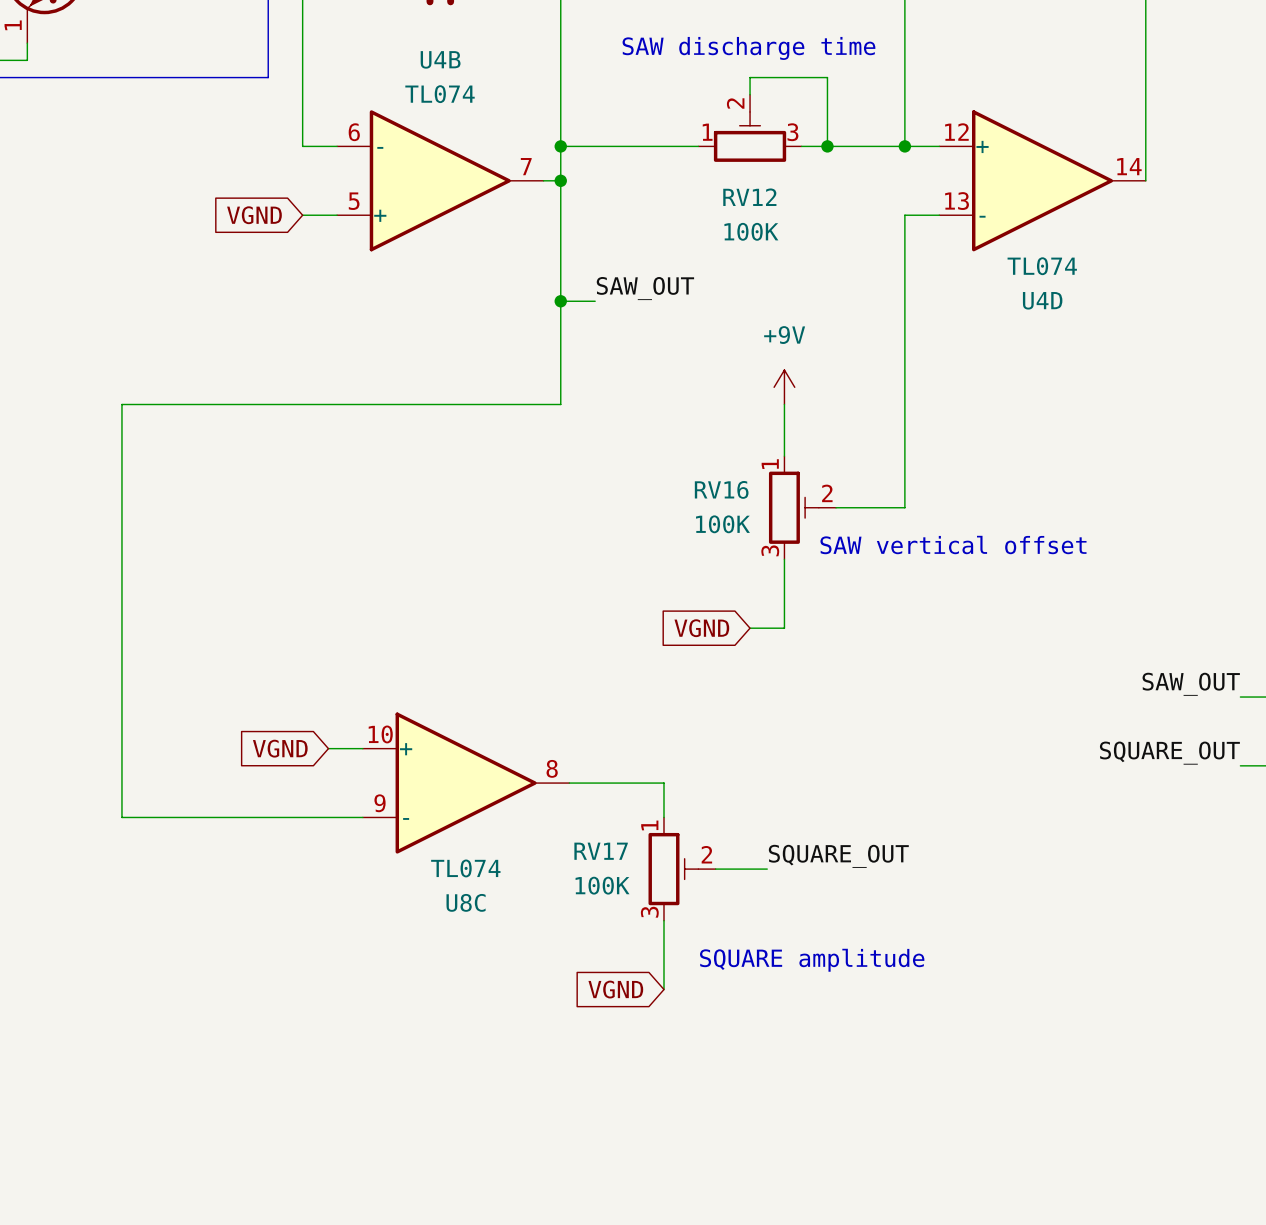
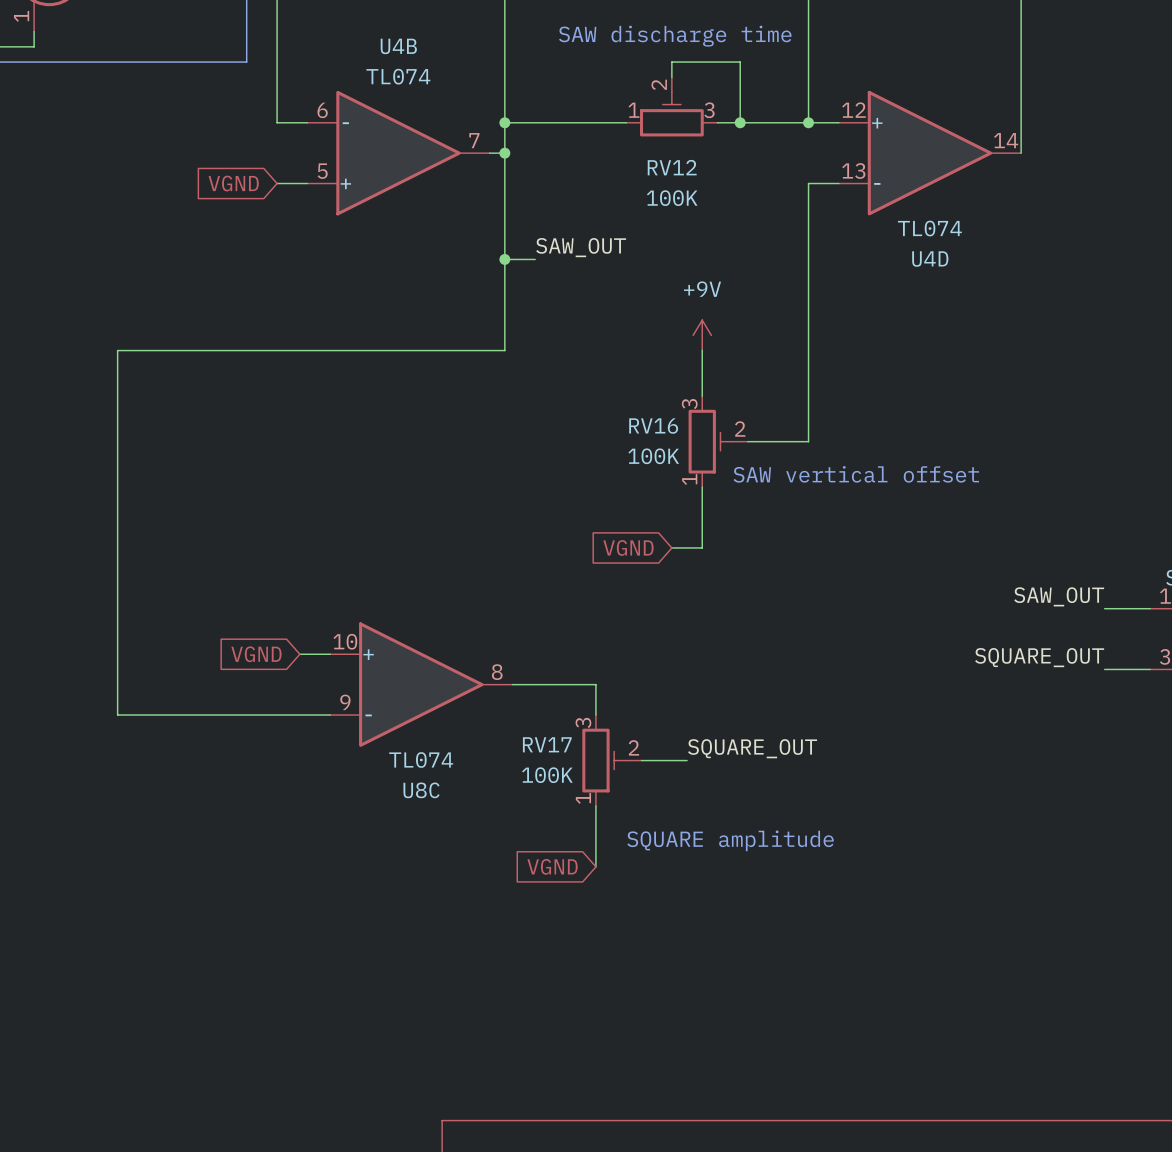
RV16 flip: as is (793, 507) -> up-down (710, 441)
RV17 flip: as is (673, 869) -> up-down (604, 760)

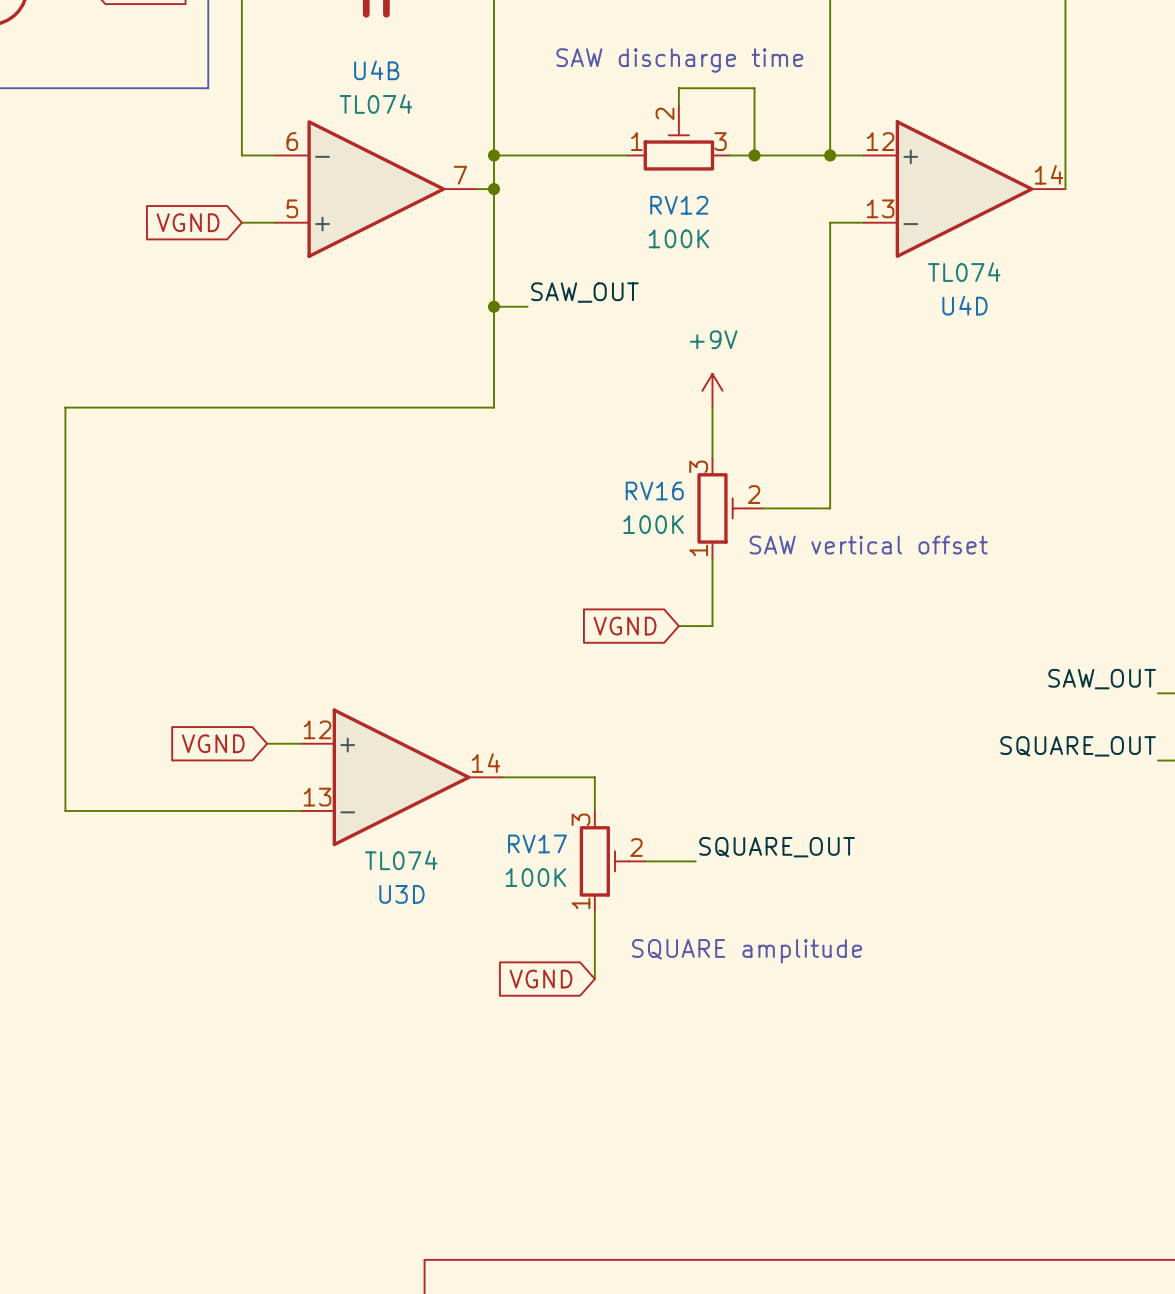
U8C pin number: 10 (345, 641) -> 12 (317, 729)
U8C pin number: 8 (497, 672) -> 14 (485, 763)
U8C pin number: 9 (345, 702) -> 13 (317, 797)
U8C name: U8C (421, 790) -> U3D (401, 894)

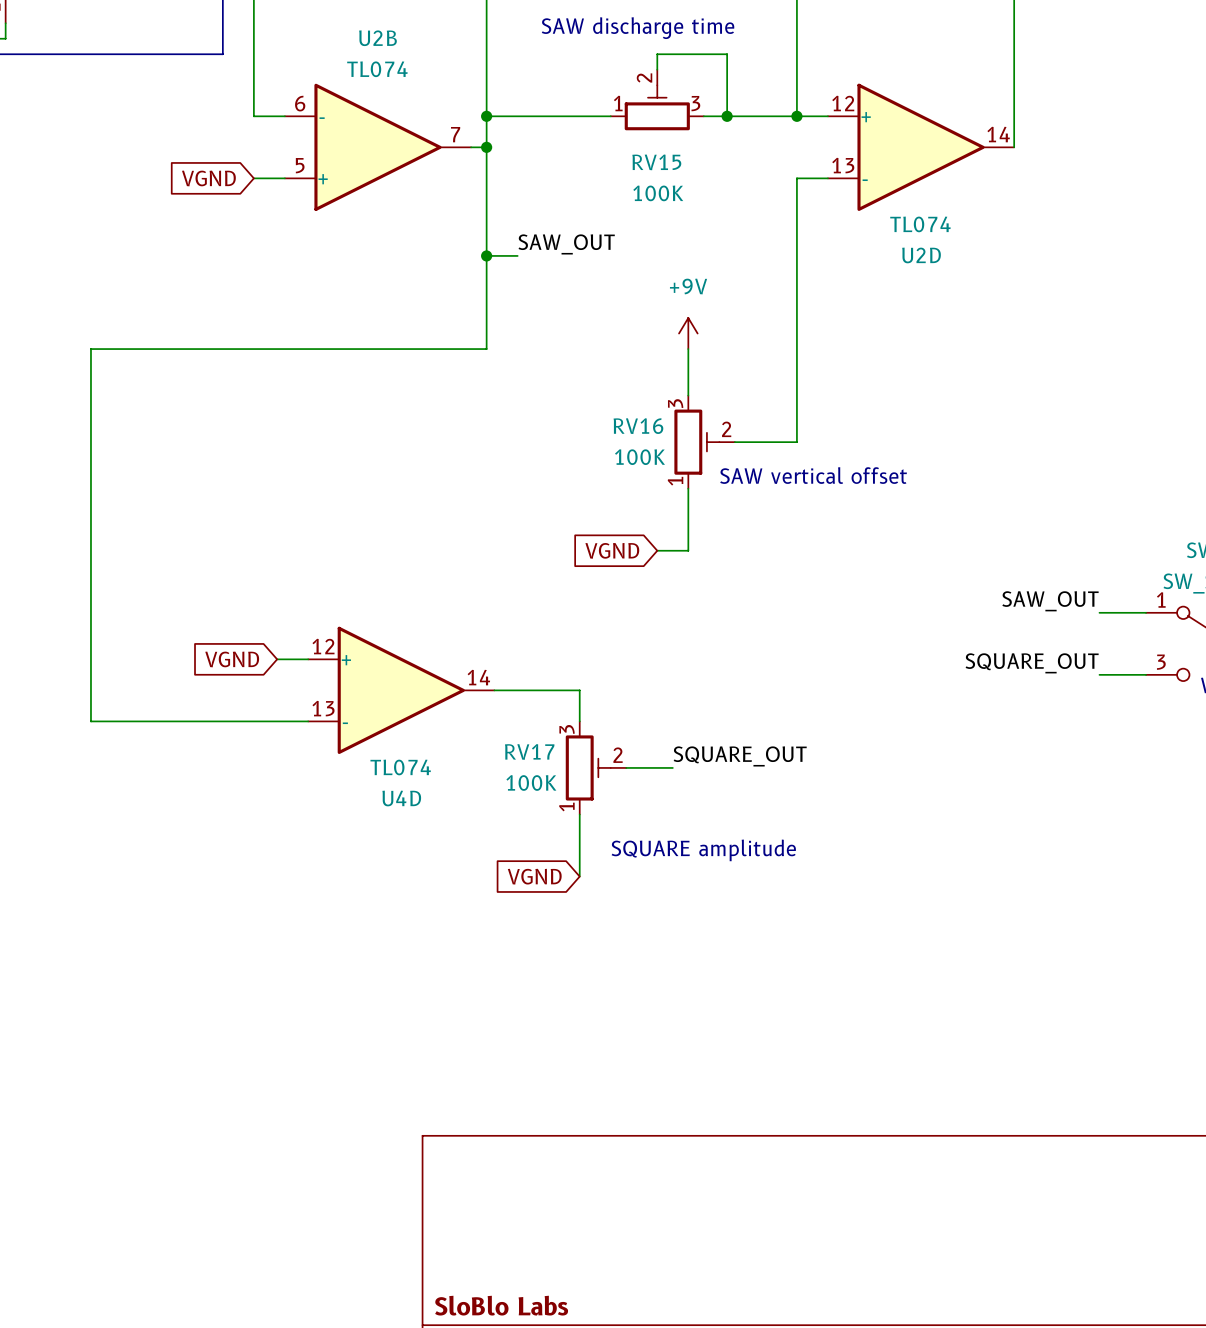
U4B name: U4B (376, 70) -> U2B (377, 38)
RV12 name: RV12 (679, 205) -> RV15 (656, 162)
U4D name: U4D (965, 305) -> U2D (921, 255)
U3D name: U3D (401, 894) -> U4D (401, 798)

